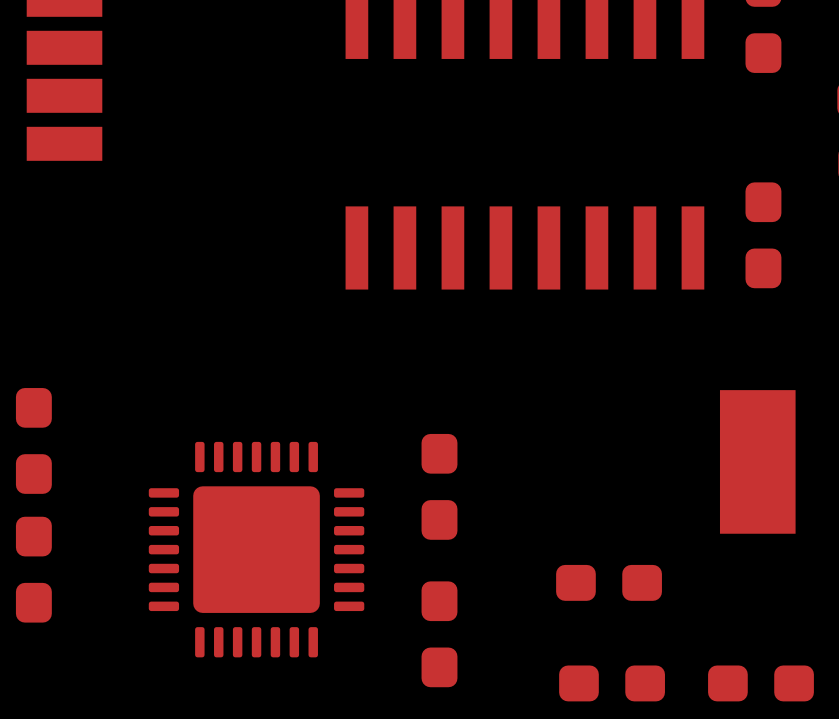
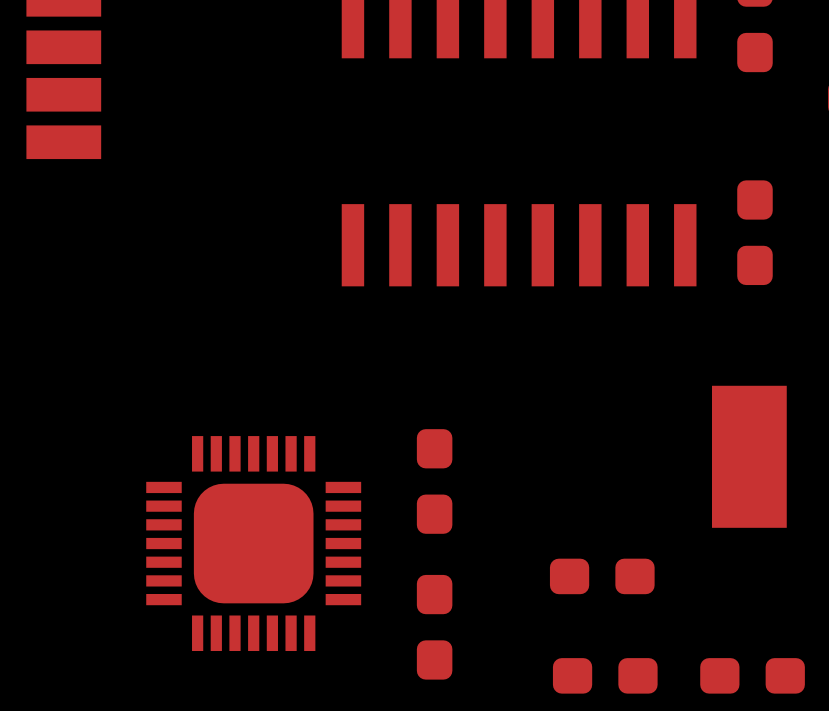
part: (33, 440) -> none
part footprint: [148, 441, 365, 658] -> [146, 436, 362, 652]
part: (33, 569) -> none

